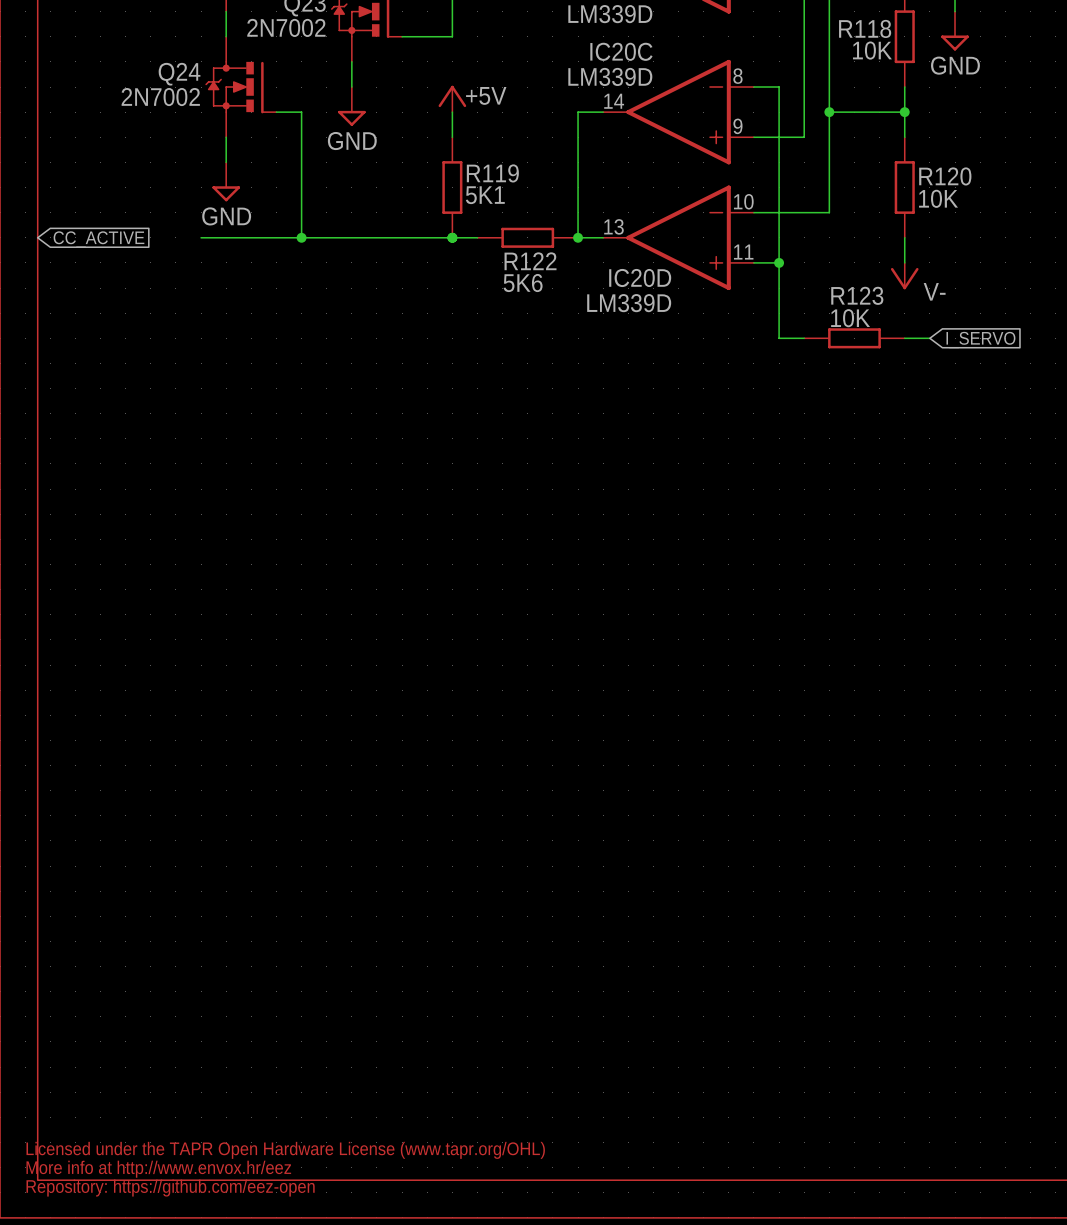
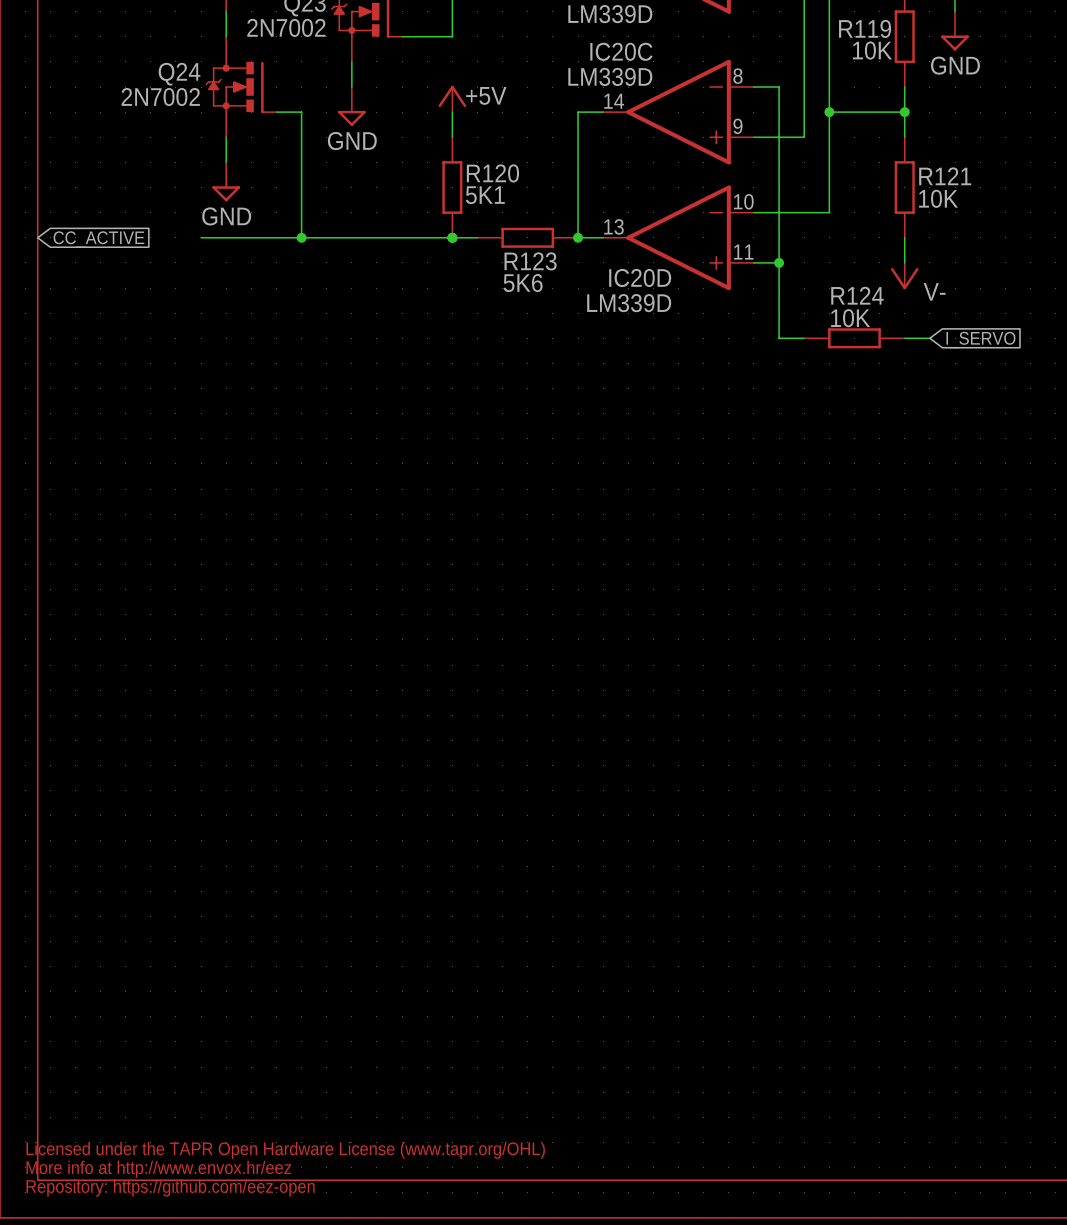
R118 name: R118 (865, 28) -> R119 (865, 28)
R119 name: R119 (492, 173) -> R120 (492, 173)
R120 name: R120 (945, 176) -> R121 (945, 176)
R122 name: R122 (530, 261) -> R123 (530, 261)
R123 name: R123 (857, 295) -> R124 (857, 295)

